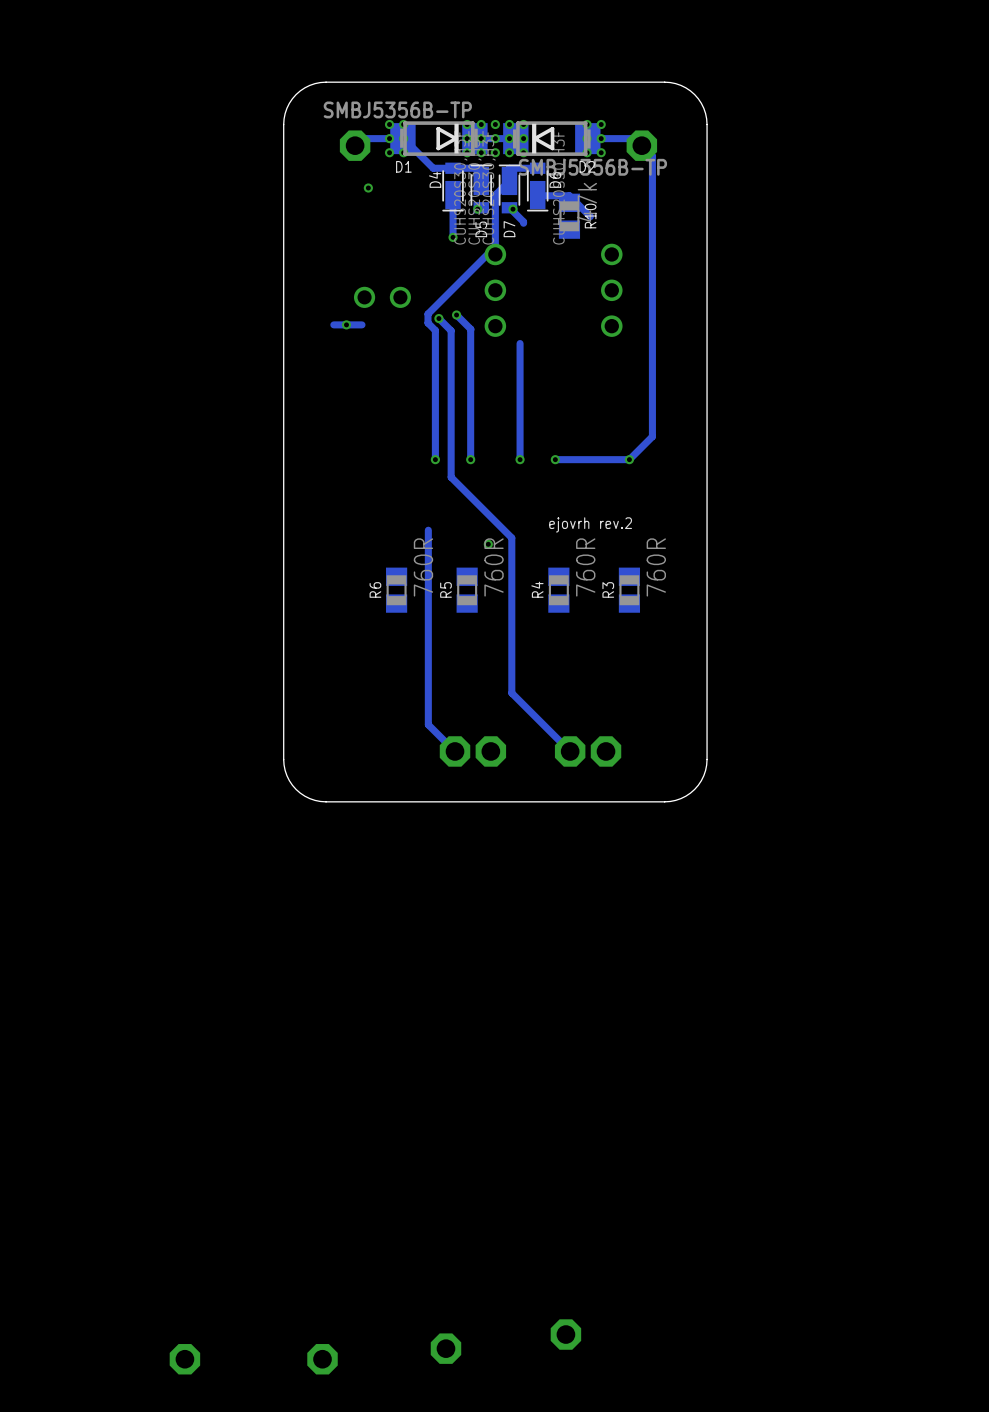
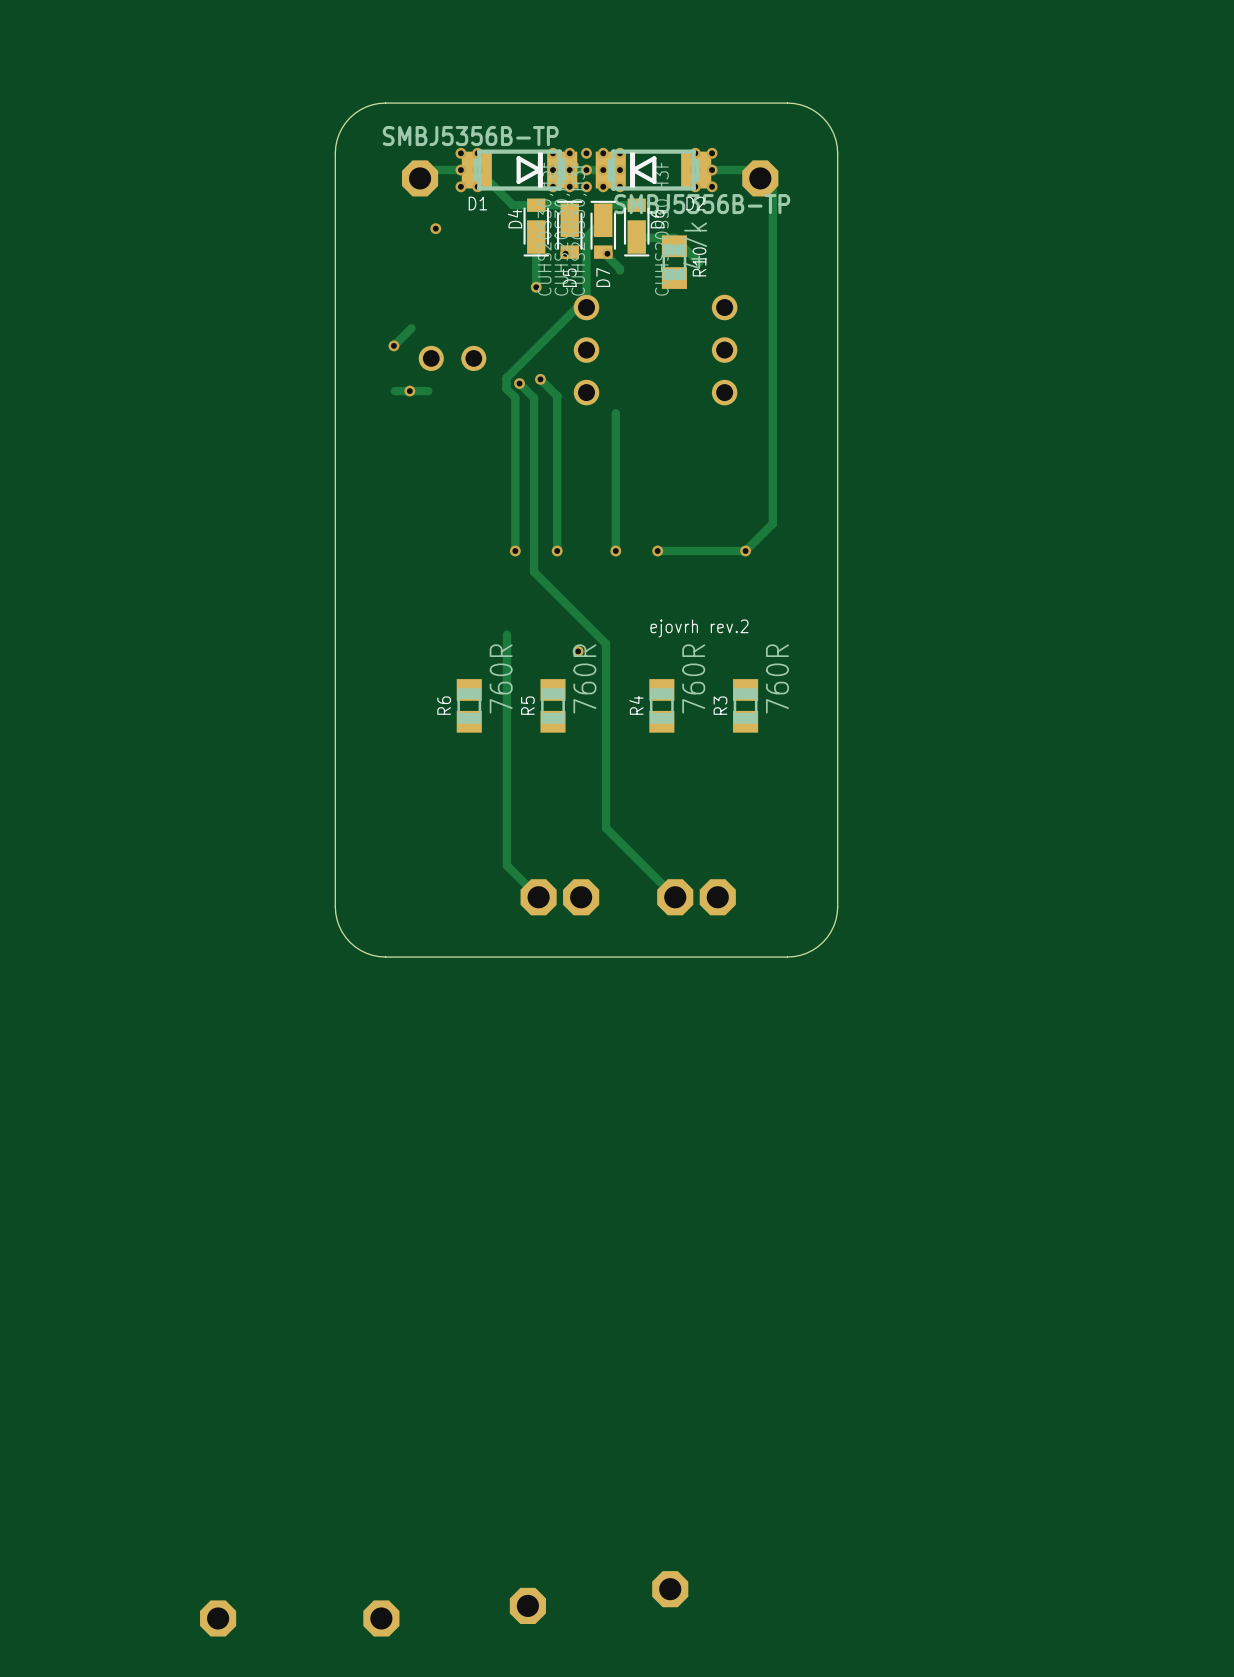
track: none -> (411, 328) (393, 345)
via: none -> (393, 345)

